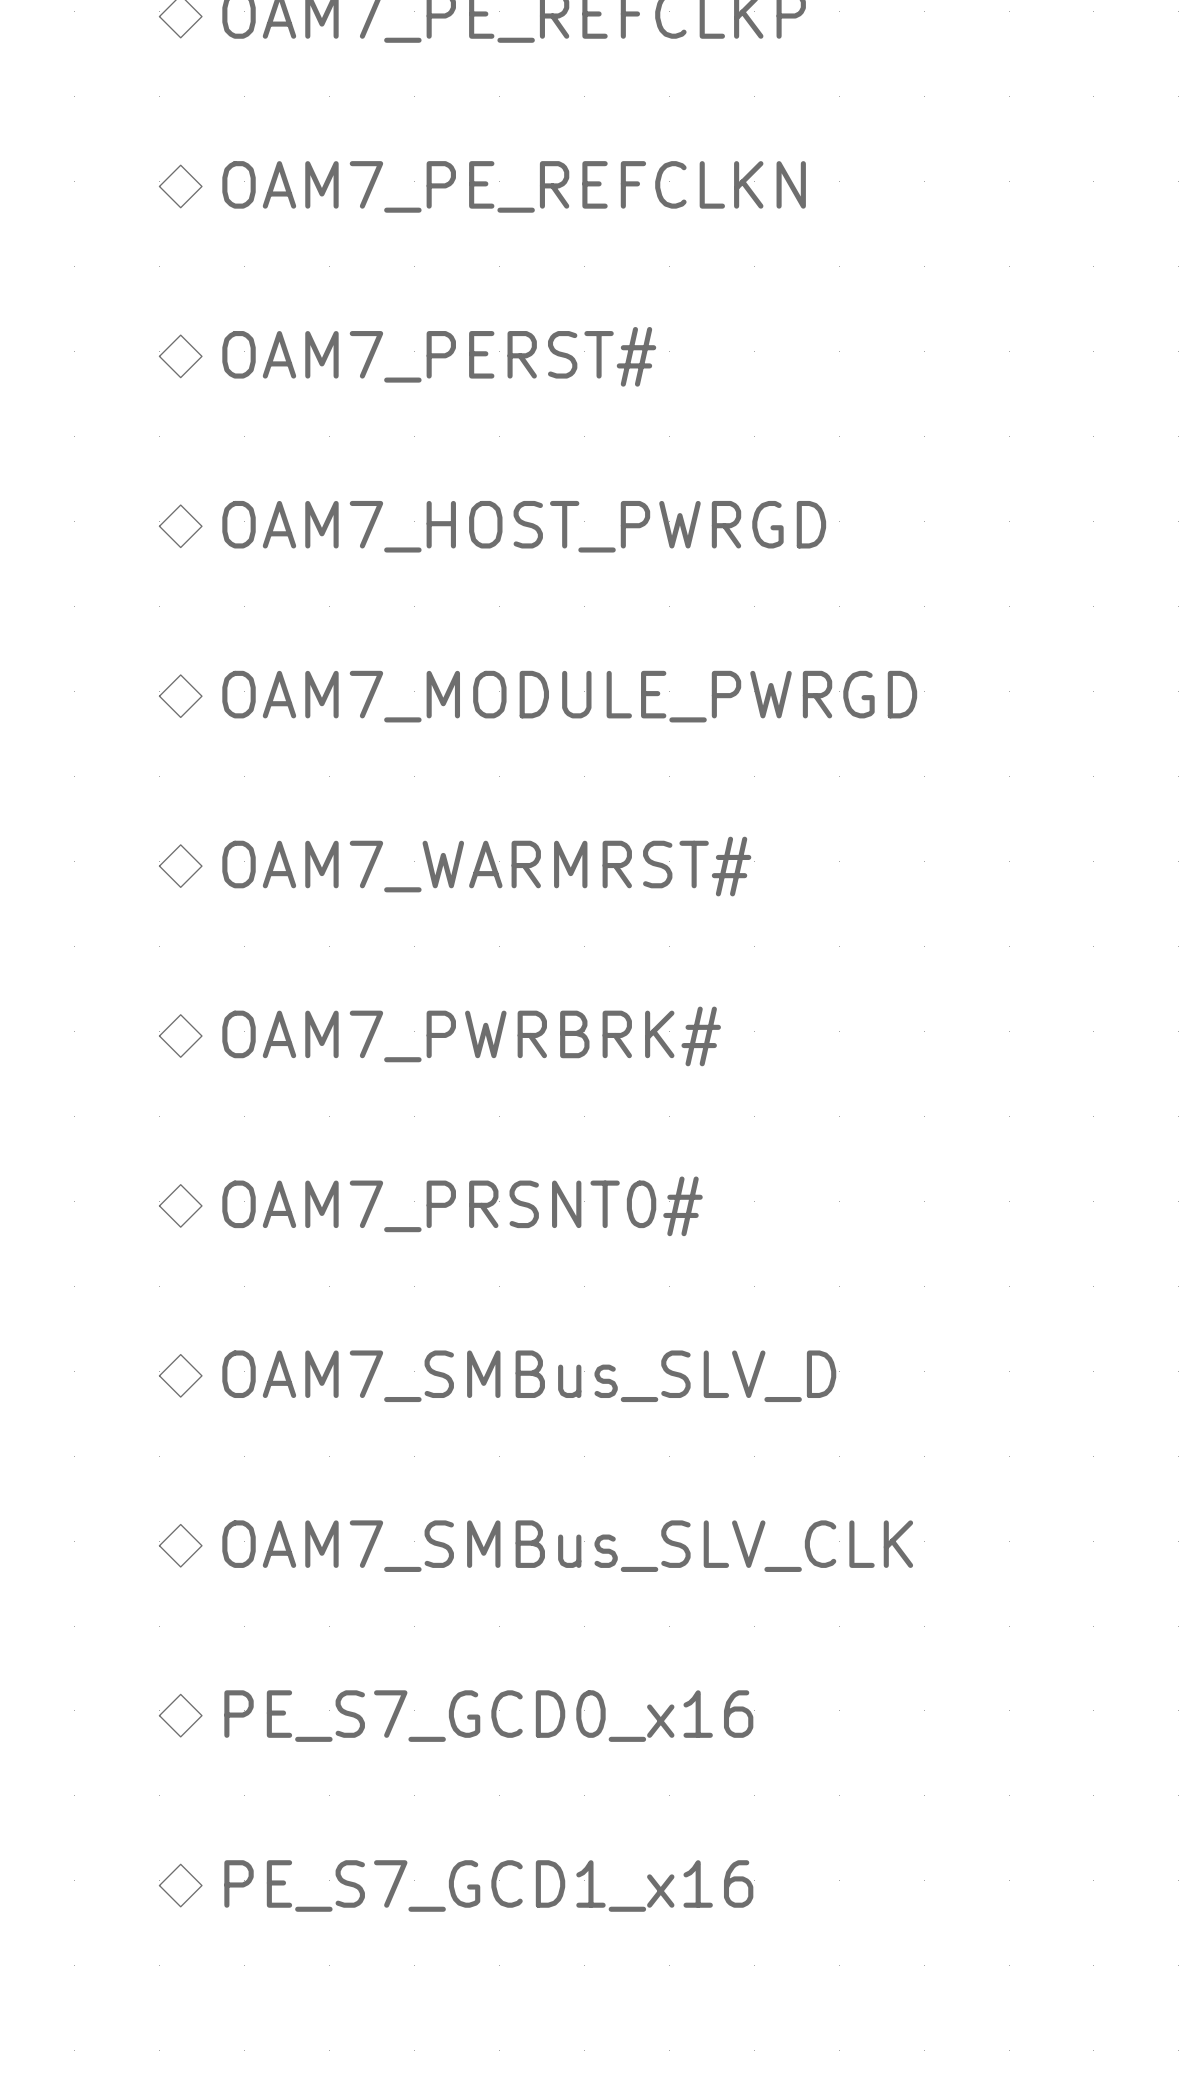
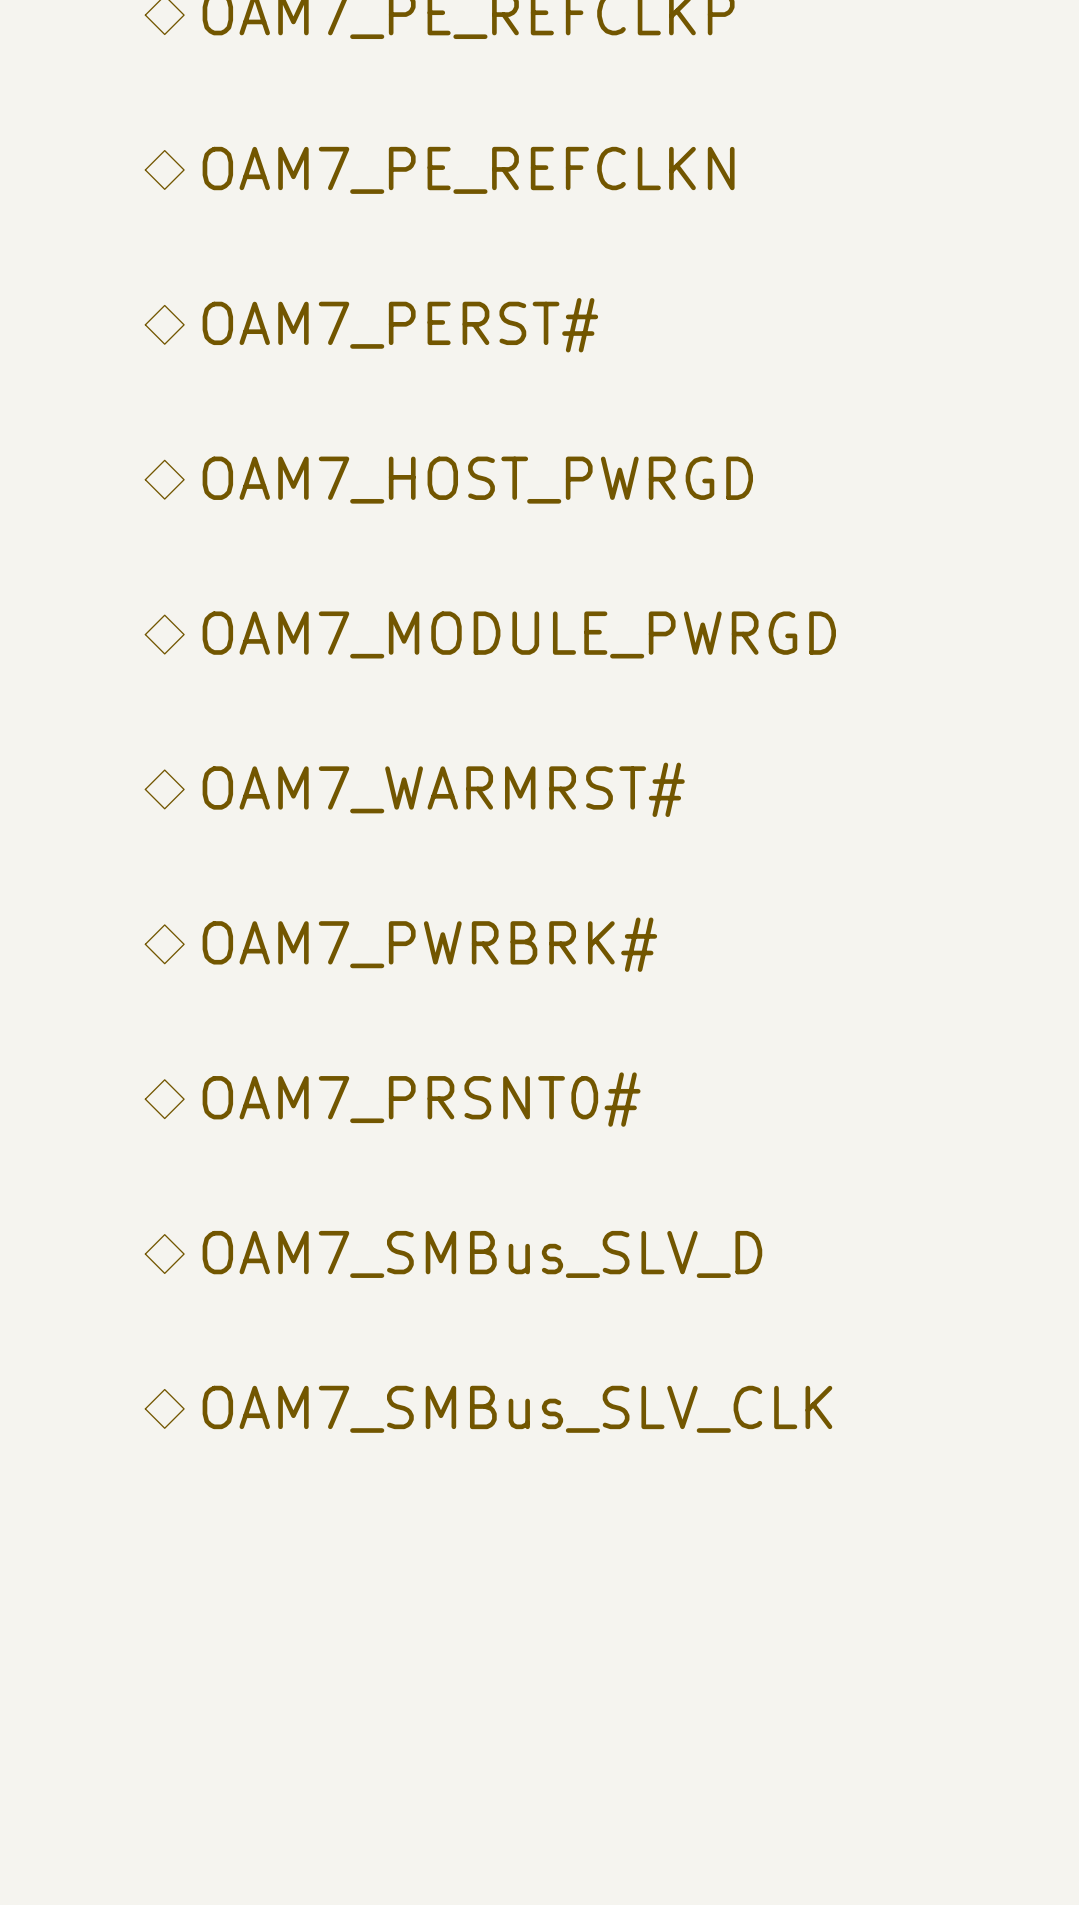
hierarchical label: PE_S7_GCD0_x16 (488, 1716) -> none
hierarchical label: PE_S7_GCD1_x16 (488, 1885) -> none

